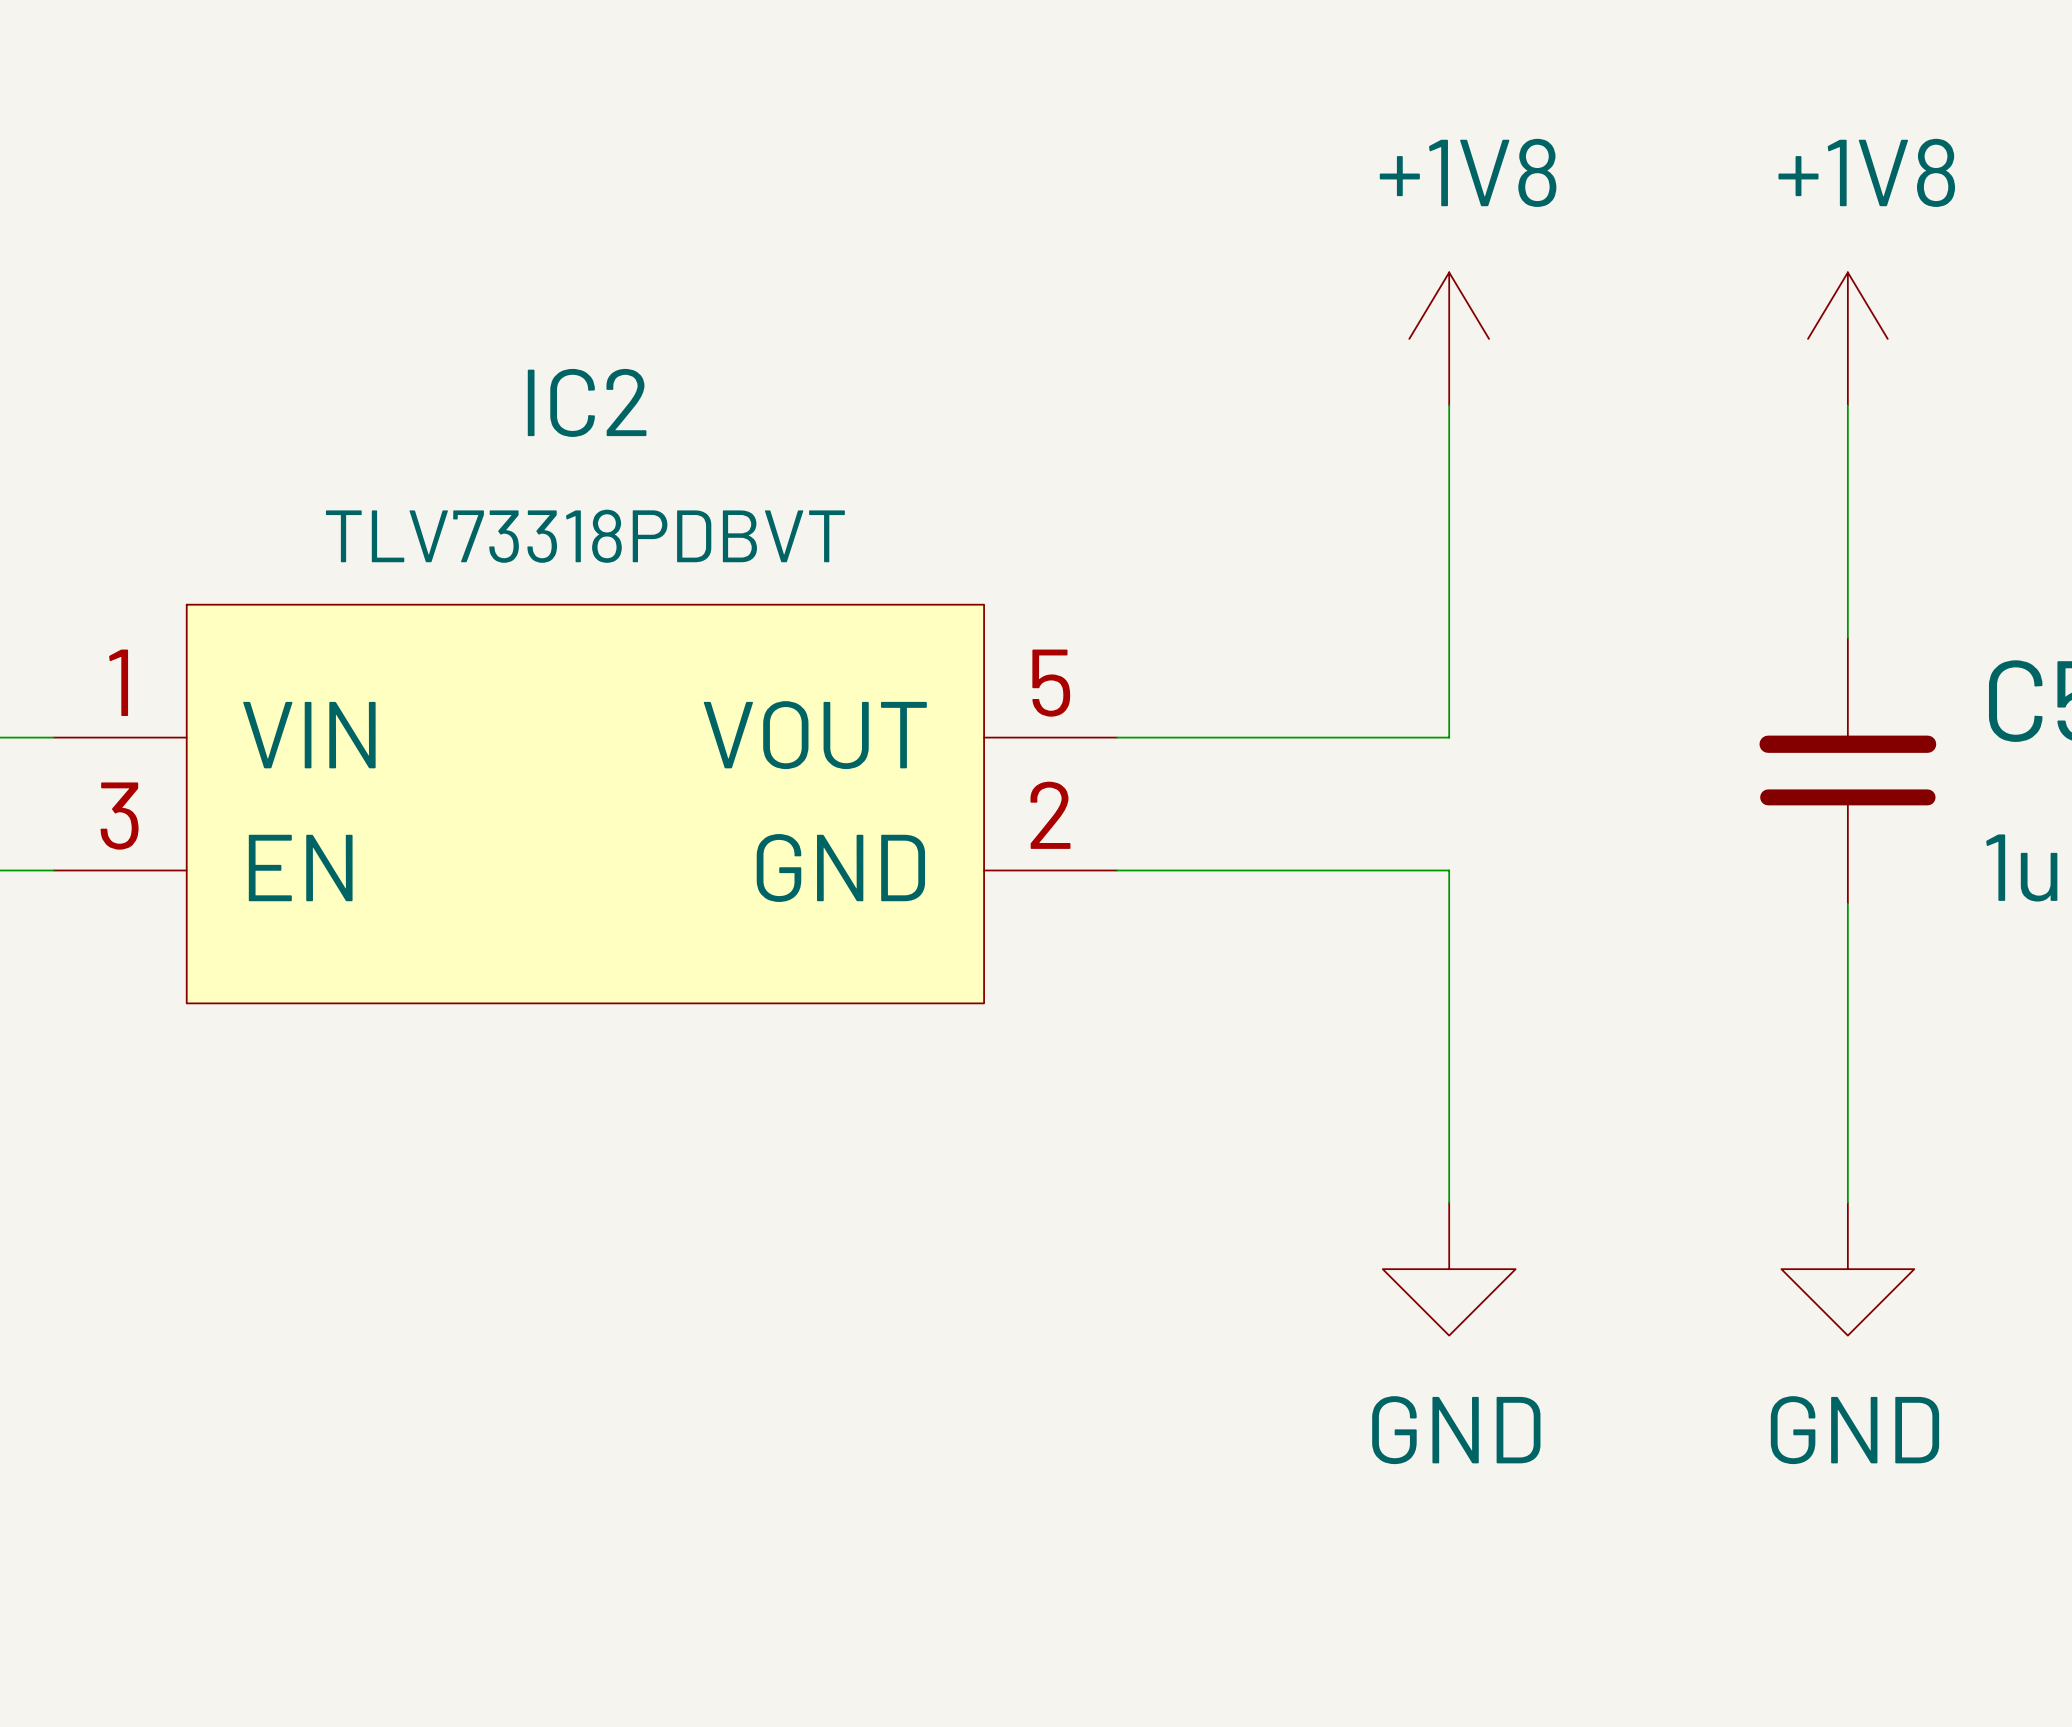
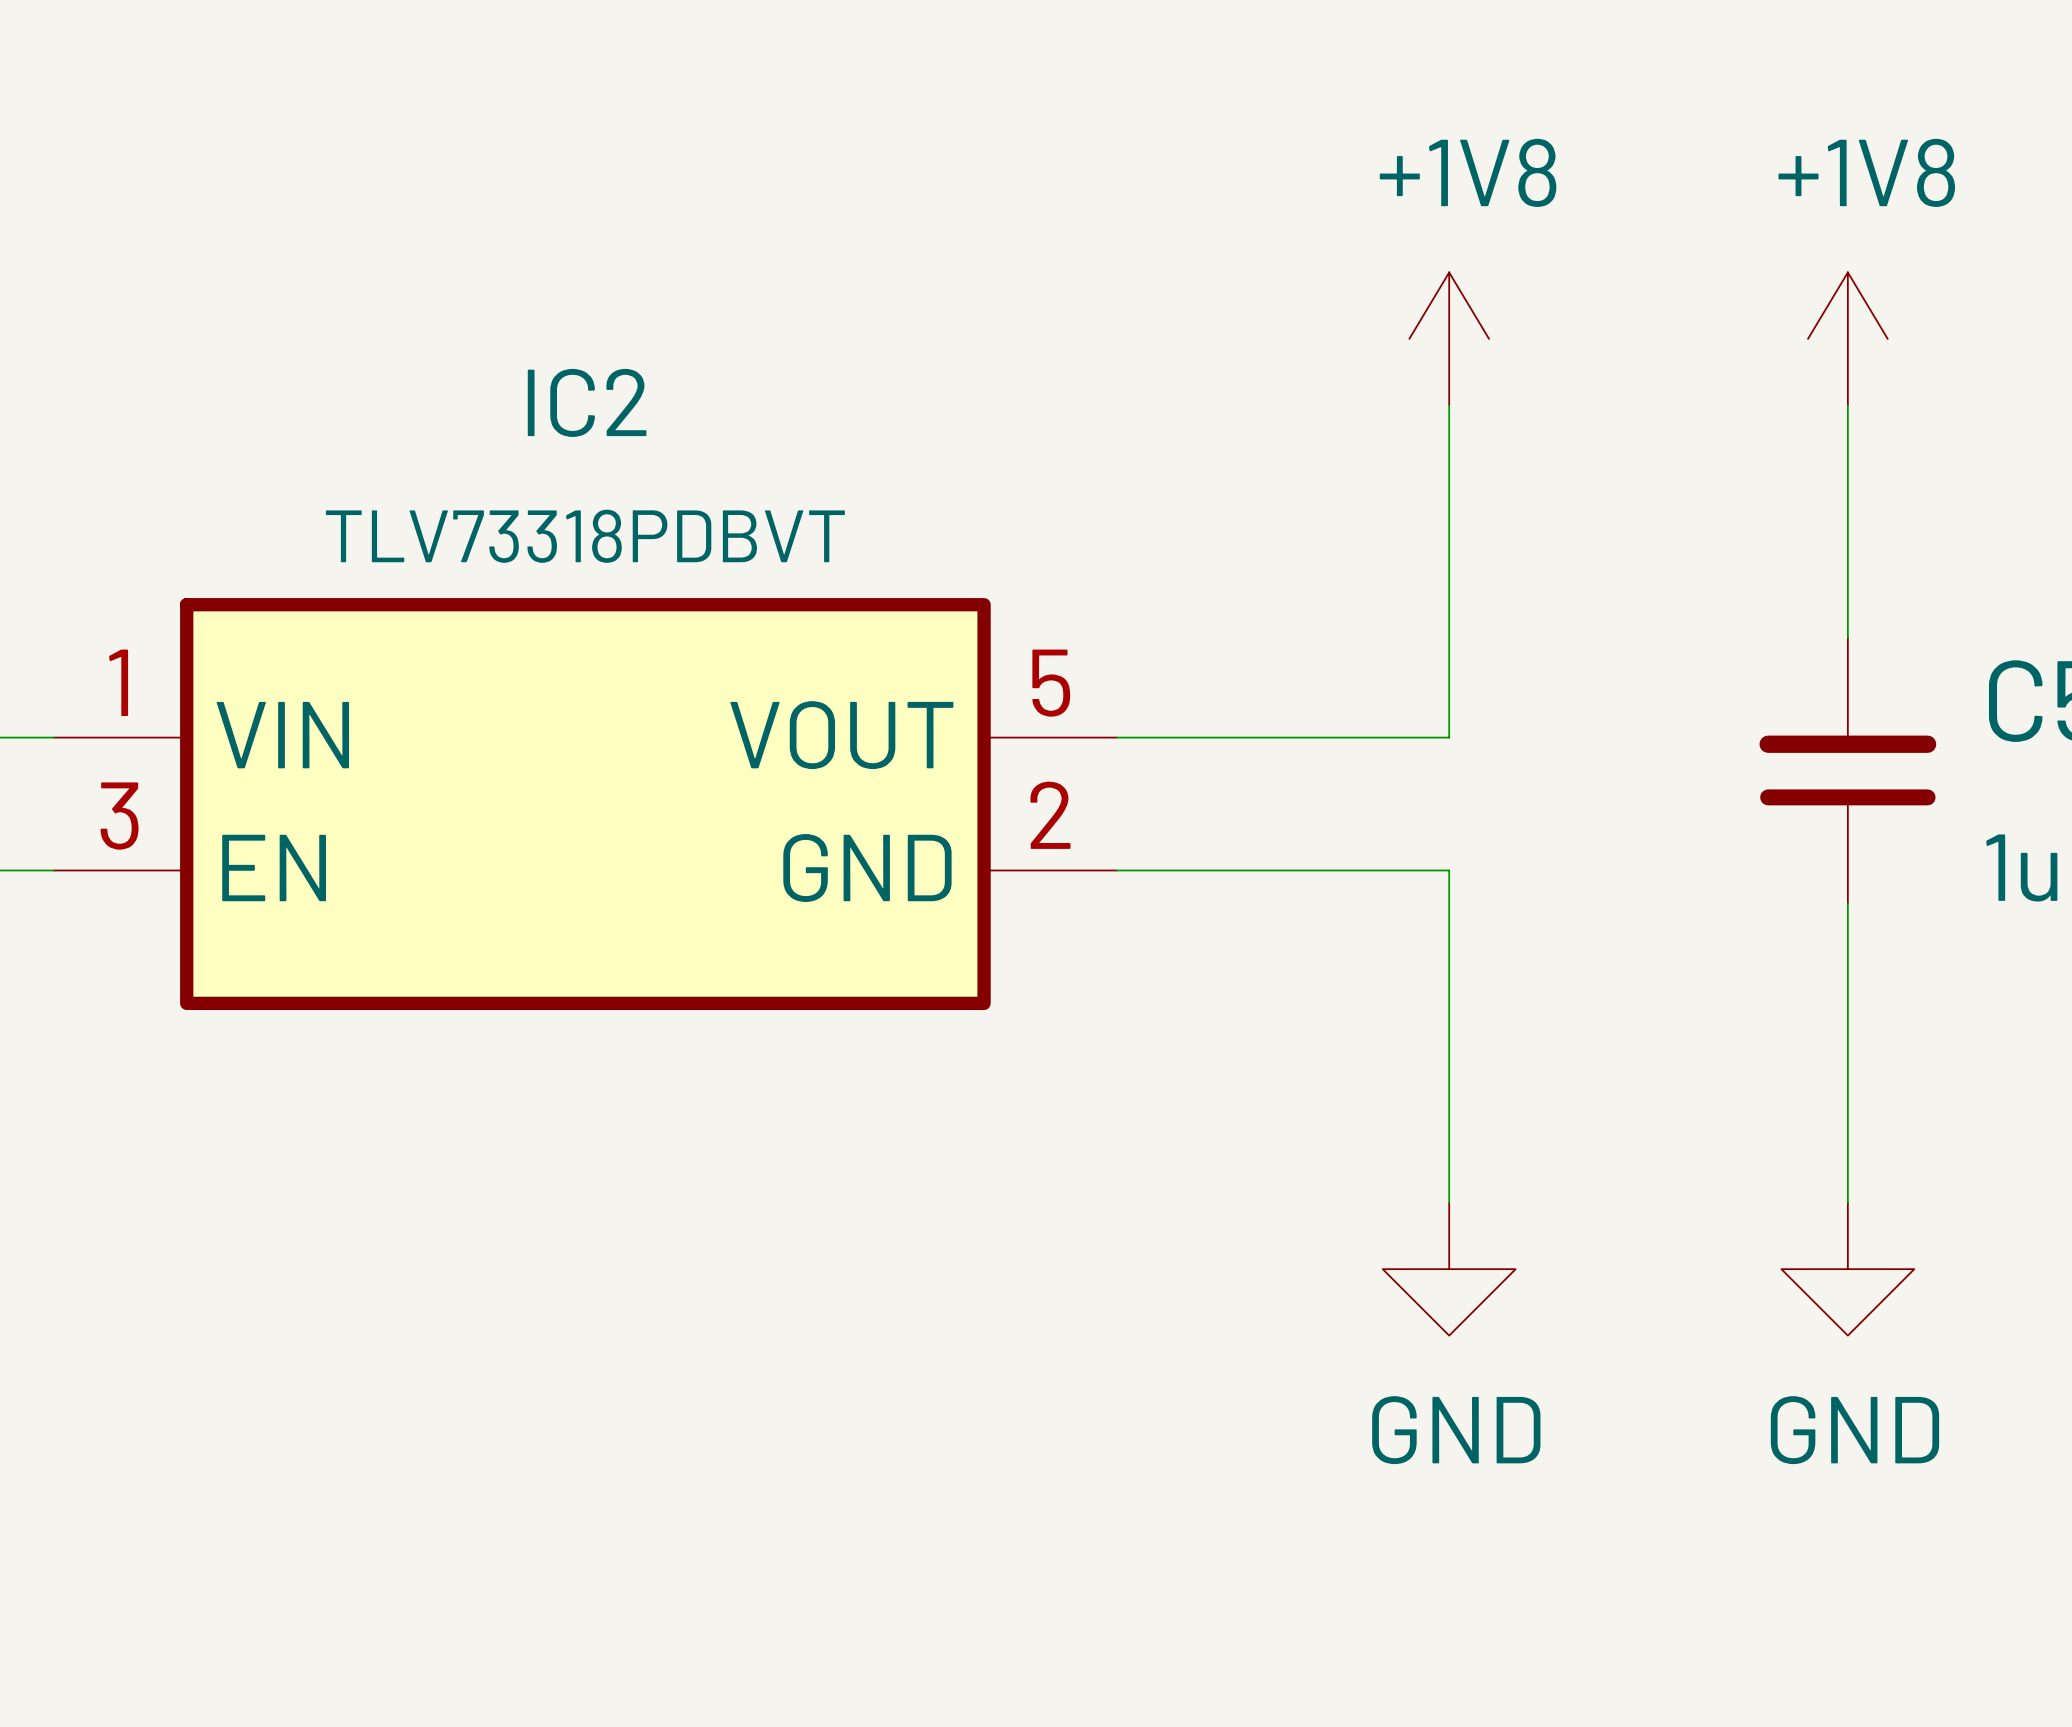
IC2 symbol: [53, 604, 1117, 1004] -> [53, 598, 1117, 1011]

